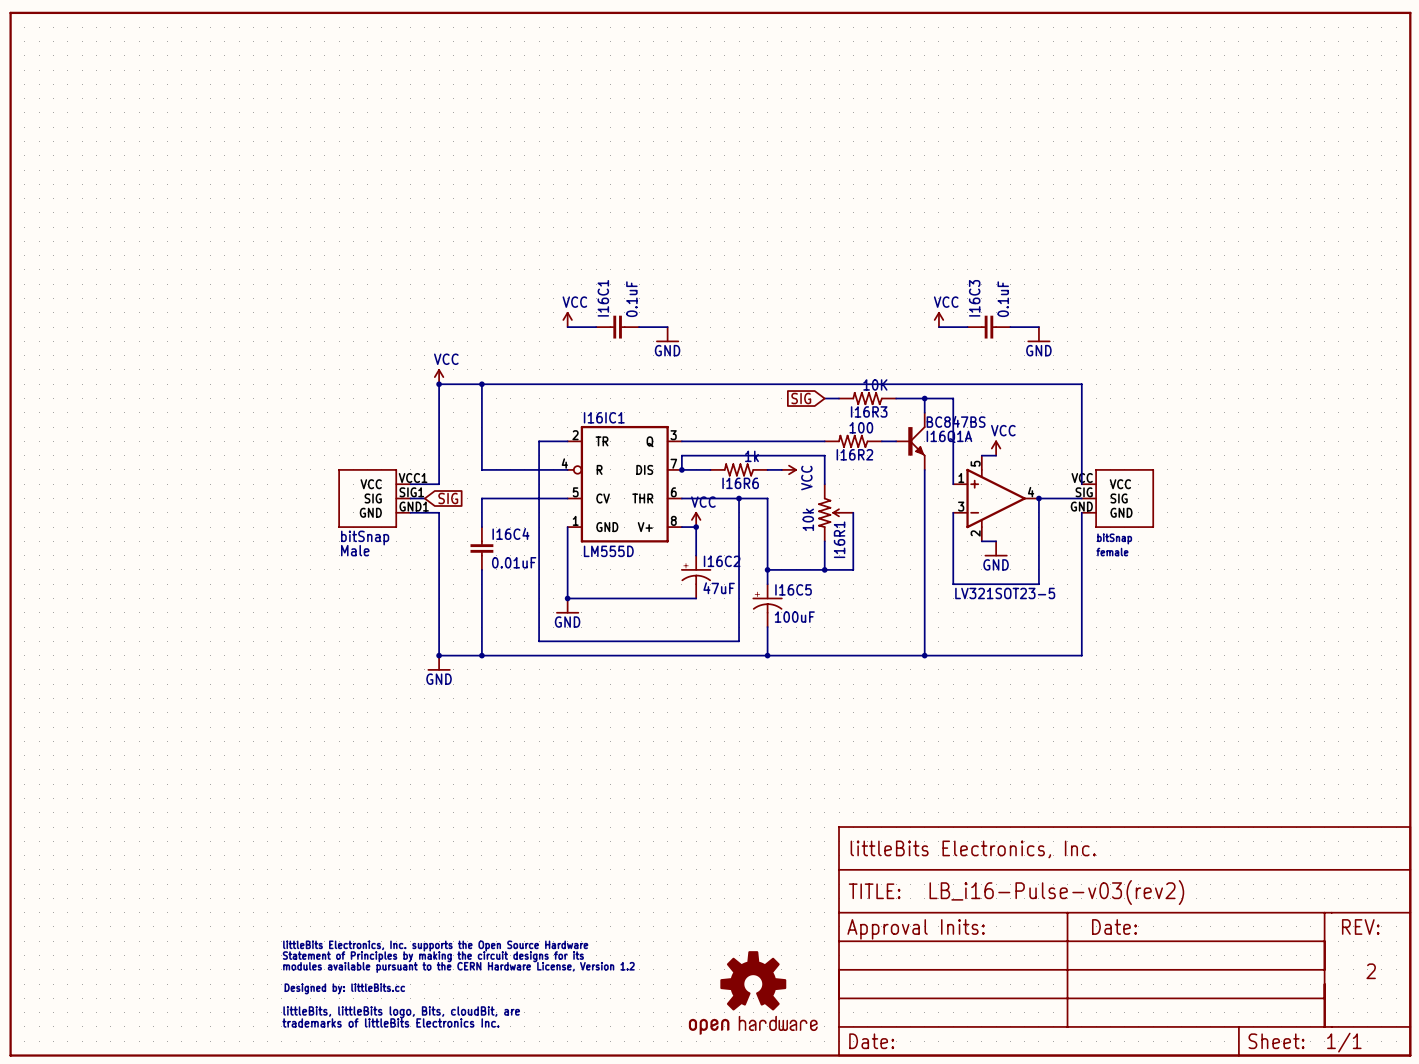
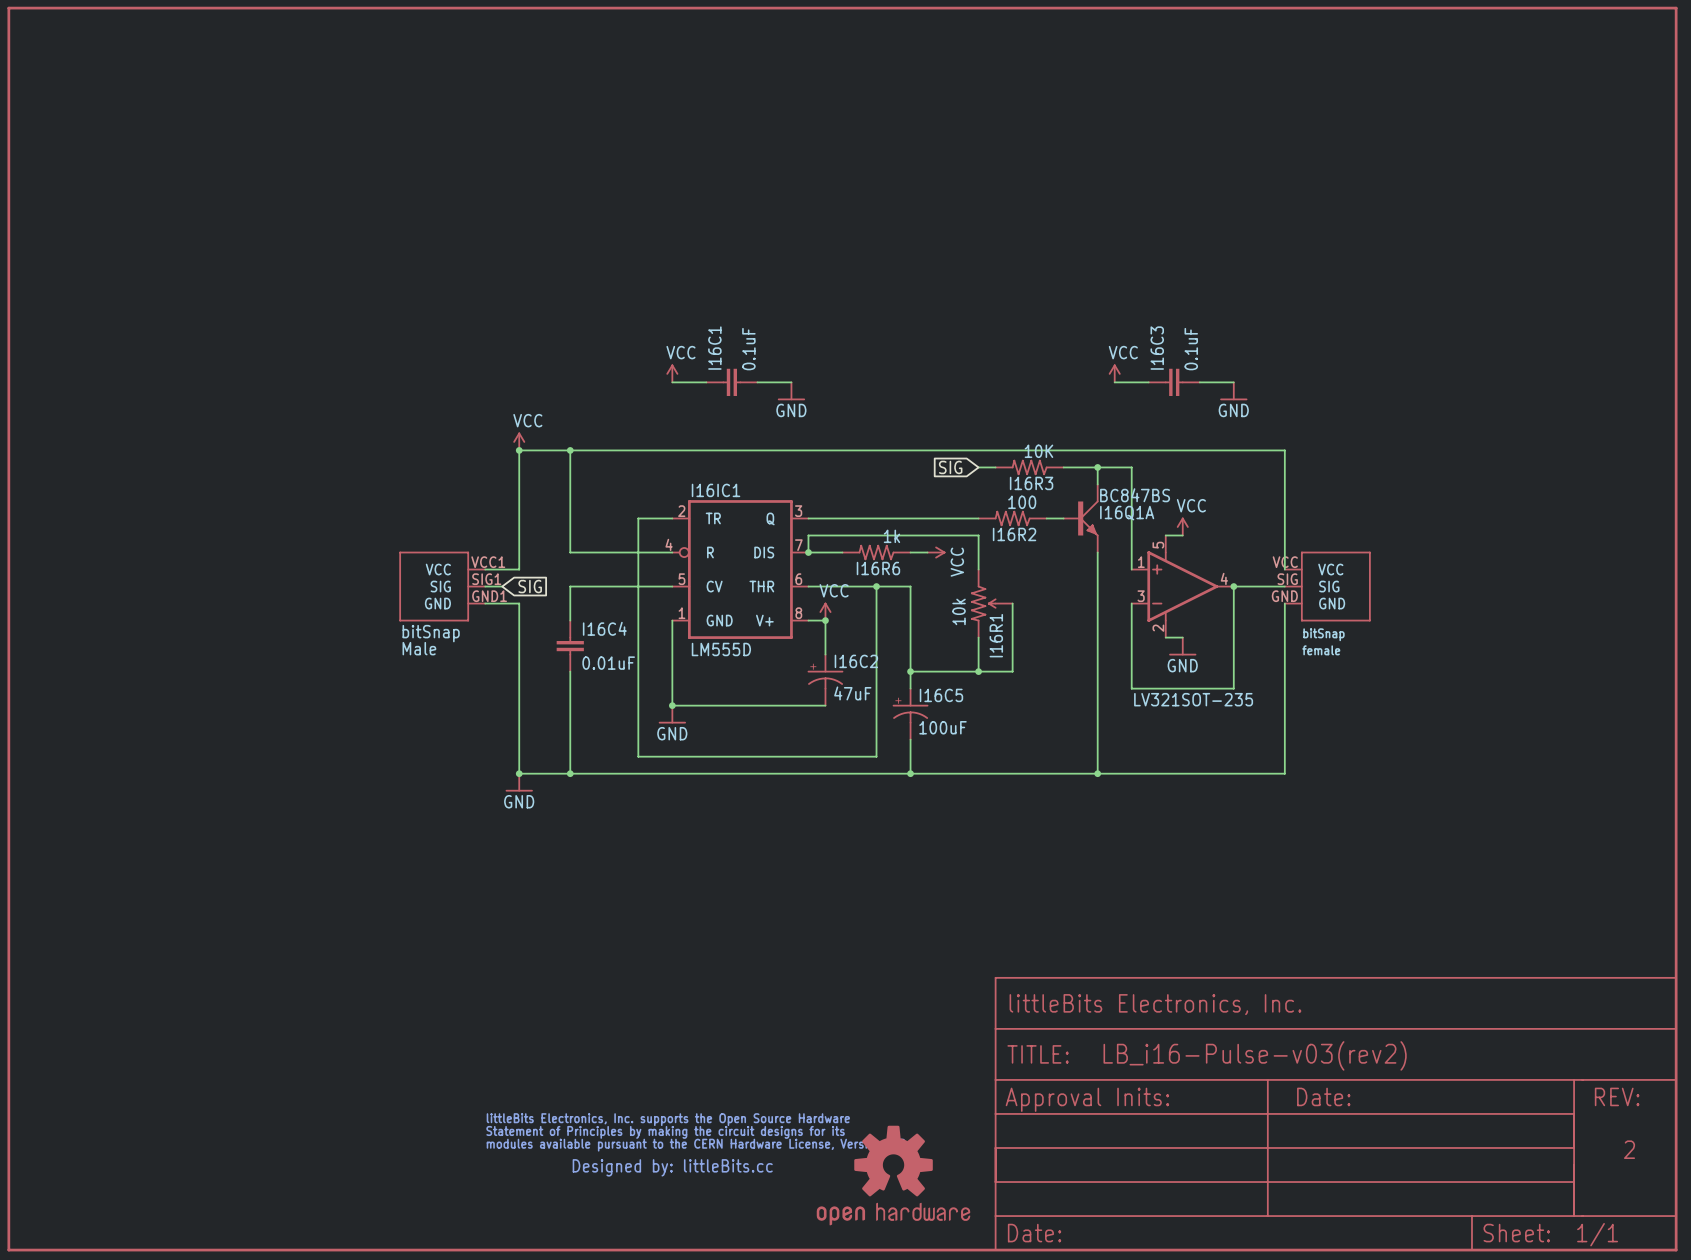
part value: LV321SOT23-5 (1005, 593) -> LV321SOT-235 (1193, 699)
part: none -> (695, 1144)
part: (458, 984) -> none

